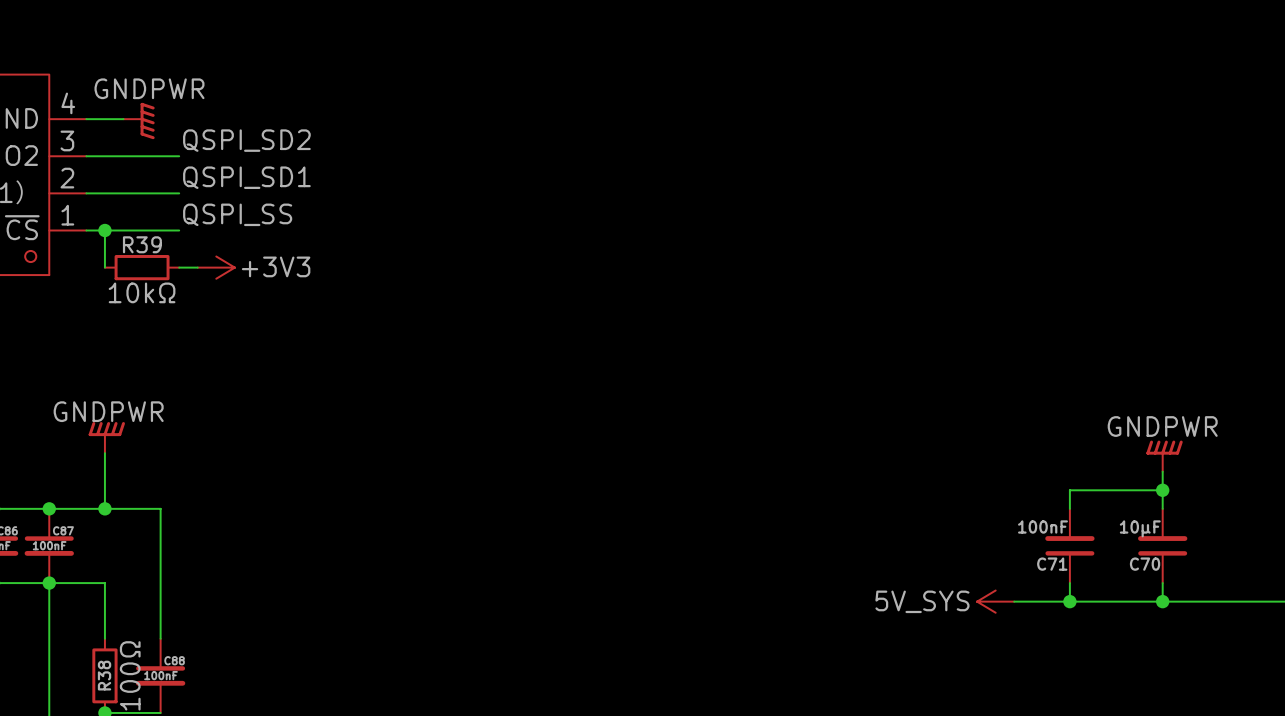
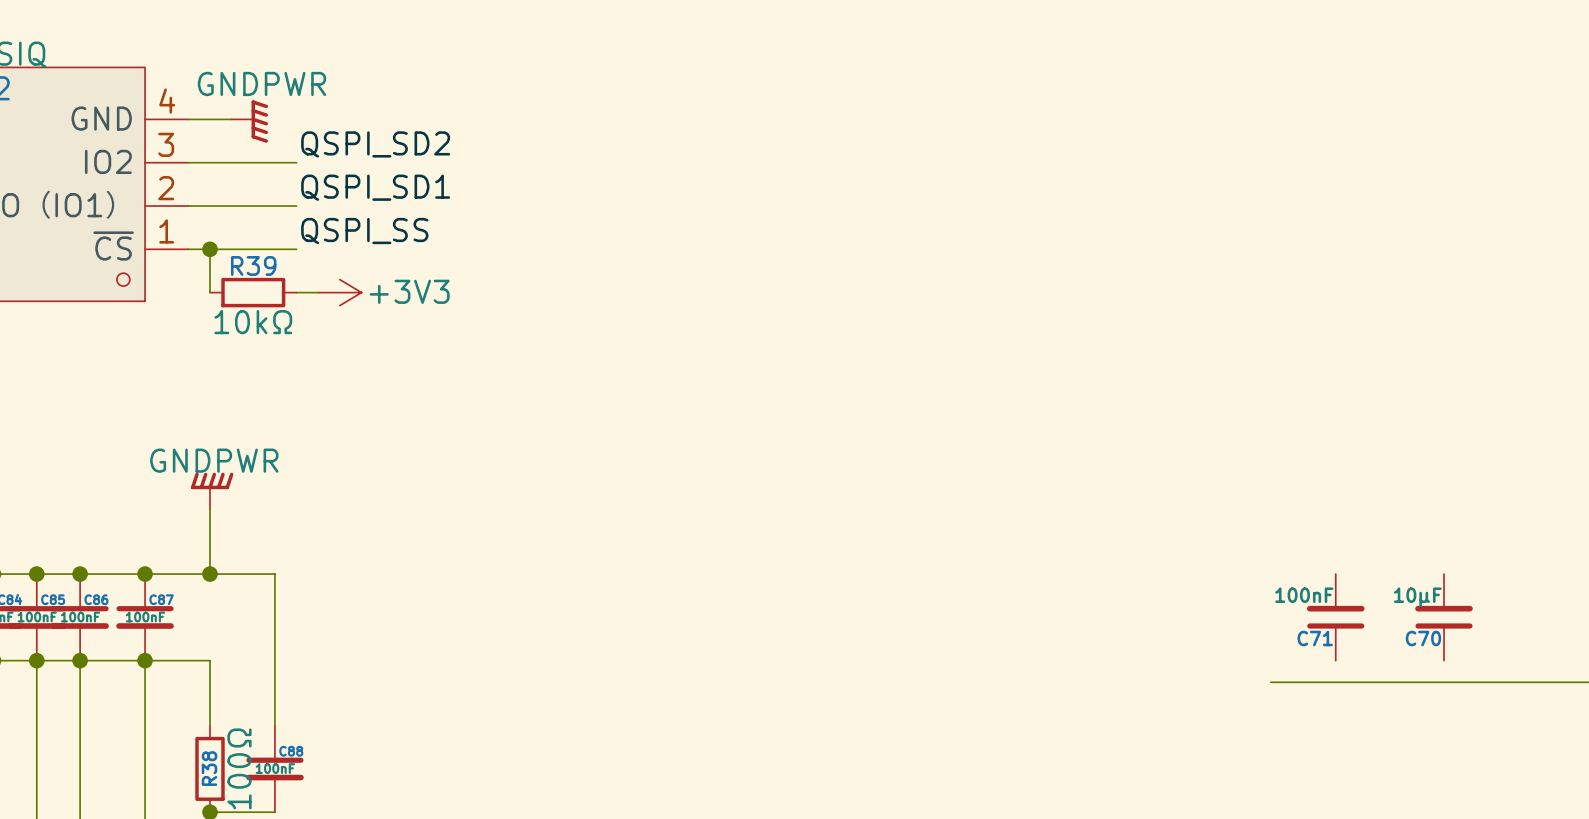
power symbol: GNDPWR (1164, 456) -> none
wire: (1162, 471) (1162, 508) -> none
wire: (1162, 490) (1069, 490) (1069, 508) -> none
junction: (1162, 490) -> none
wire: (1069, 583) (1069, 601) -> none
wire: (1162, 583) (1162, 601) -> none
power symbol: 5V_SYS (995, 601) -> none
junction: (1069, 601) -> none
junction: (1162, 601) -> none

